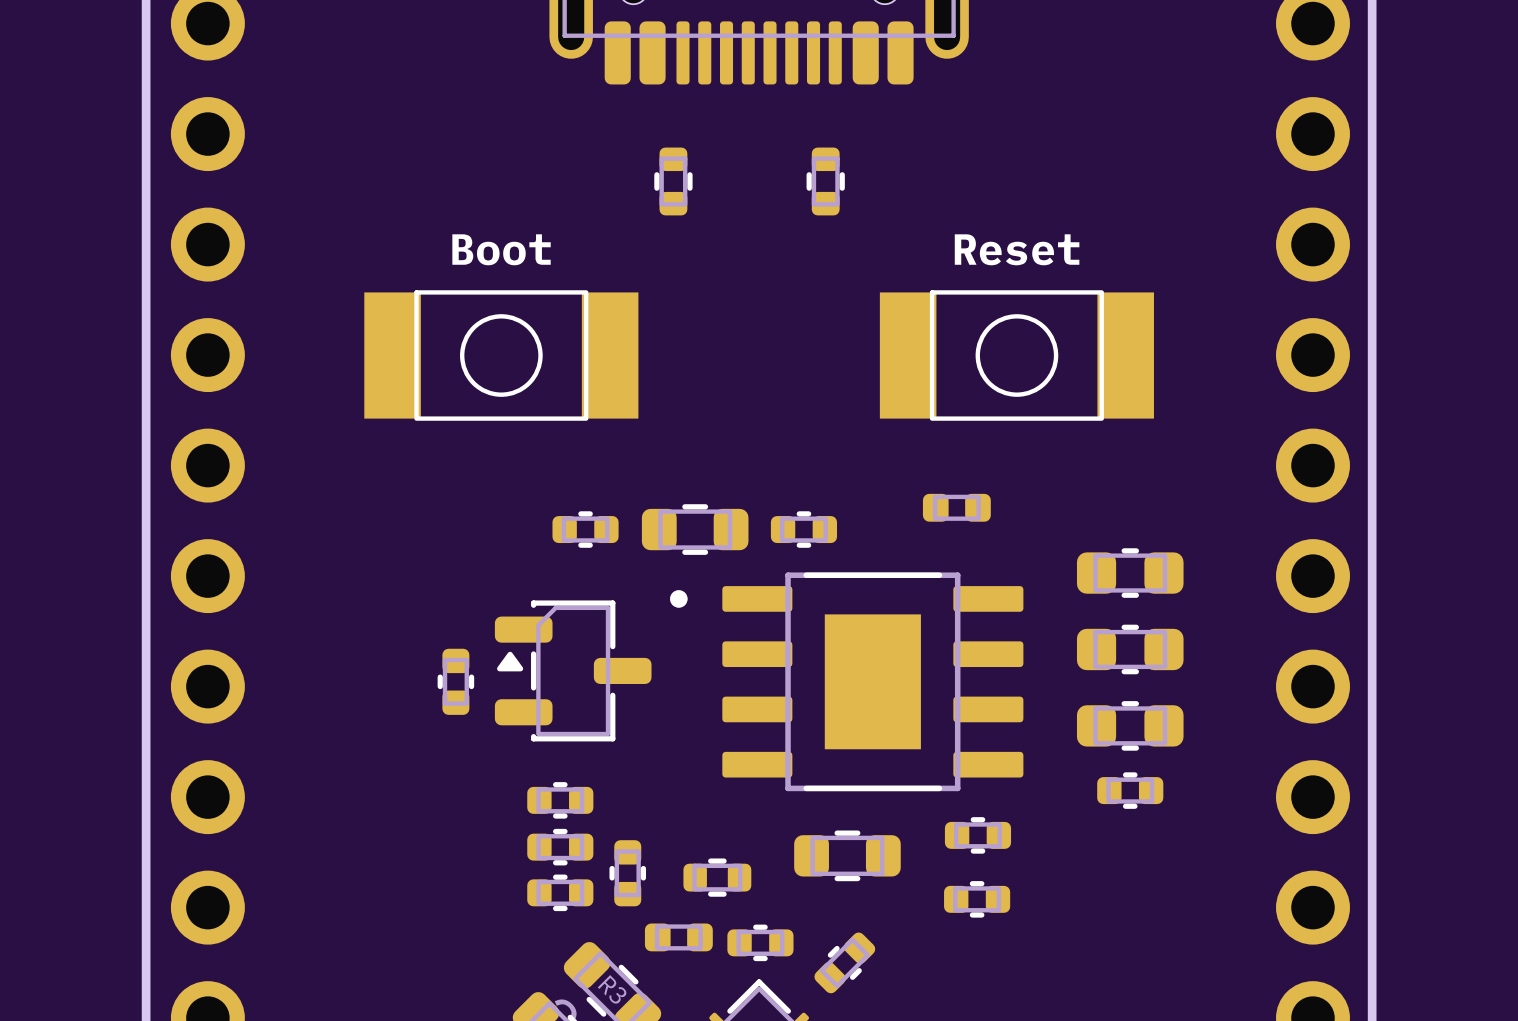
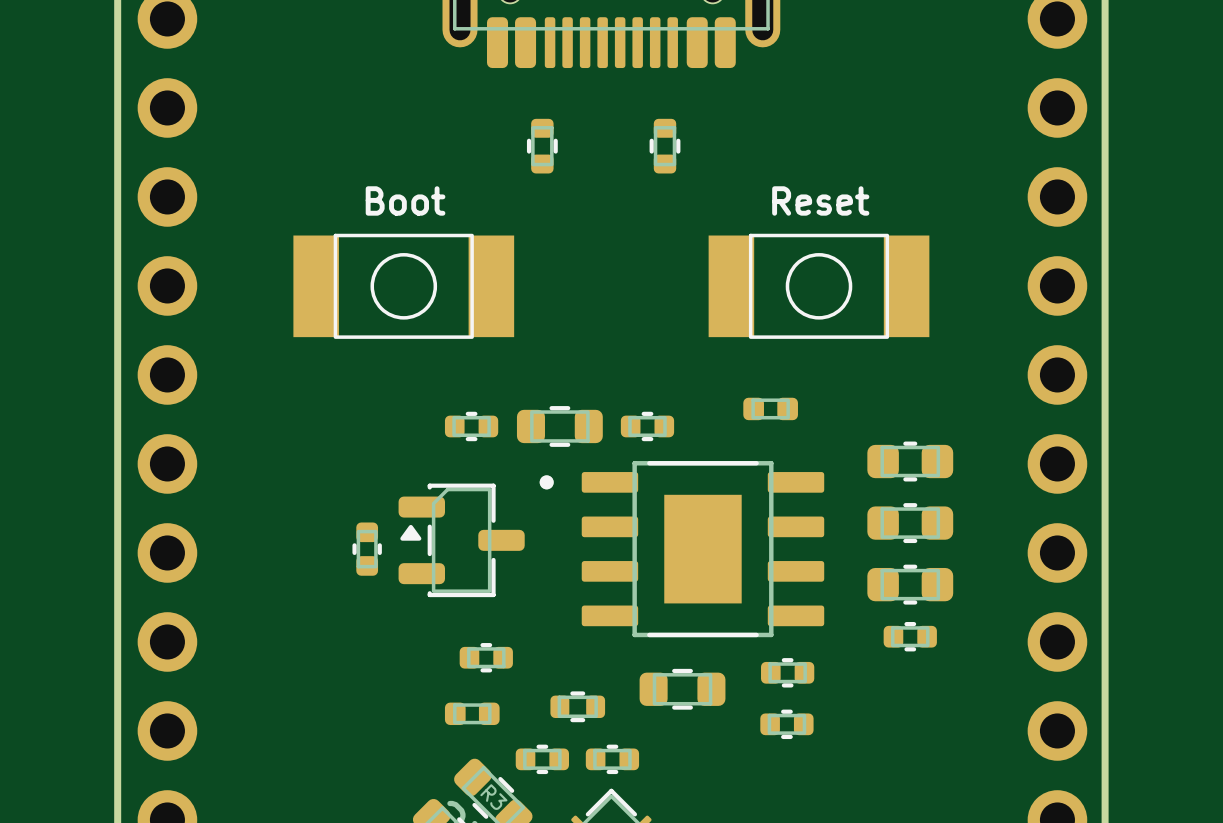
part: (560, 800) -> none
part: none -> (486, 657)
part: (560, 847) -> none
part: (627, 873) -> none
part: none -> (472, 713)
part: (560, 892) -> none
part footprint: [644, 923, 713, 952] -> [515, 744, 569, 775]
part: (844, 962) -> none

